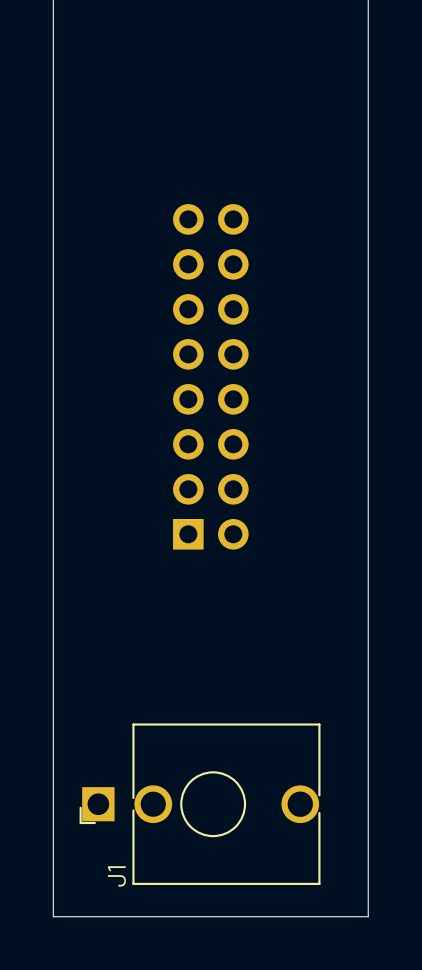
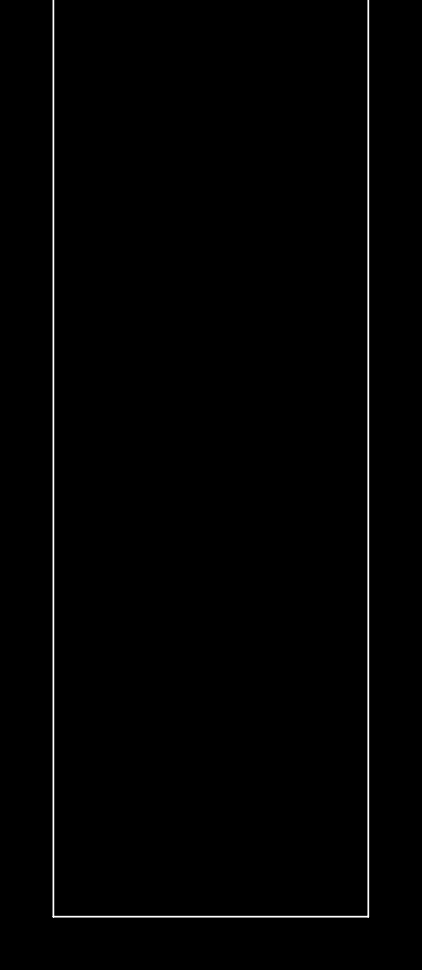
part: (210, 376) -> none
J1: (200, 804) -> none

